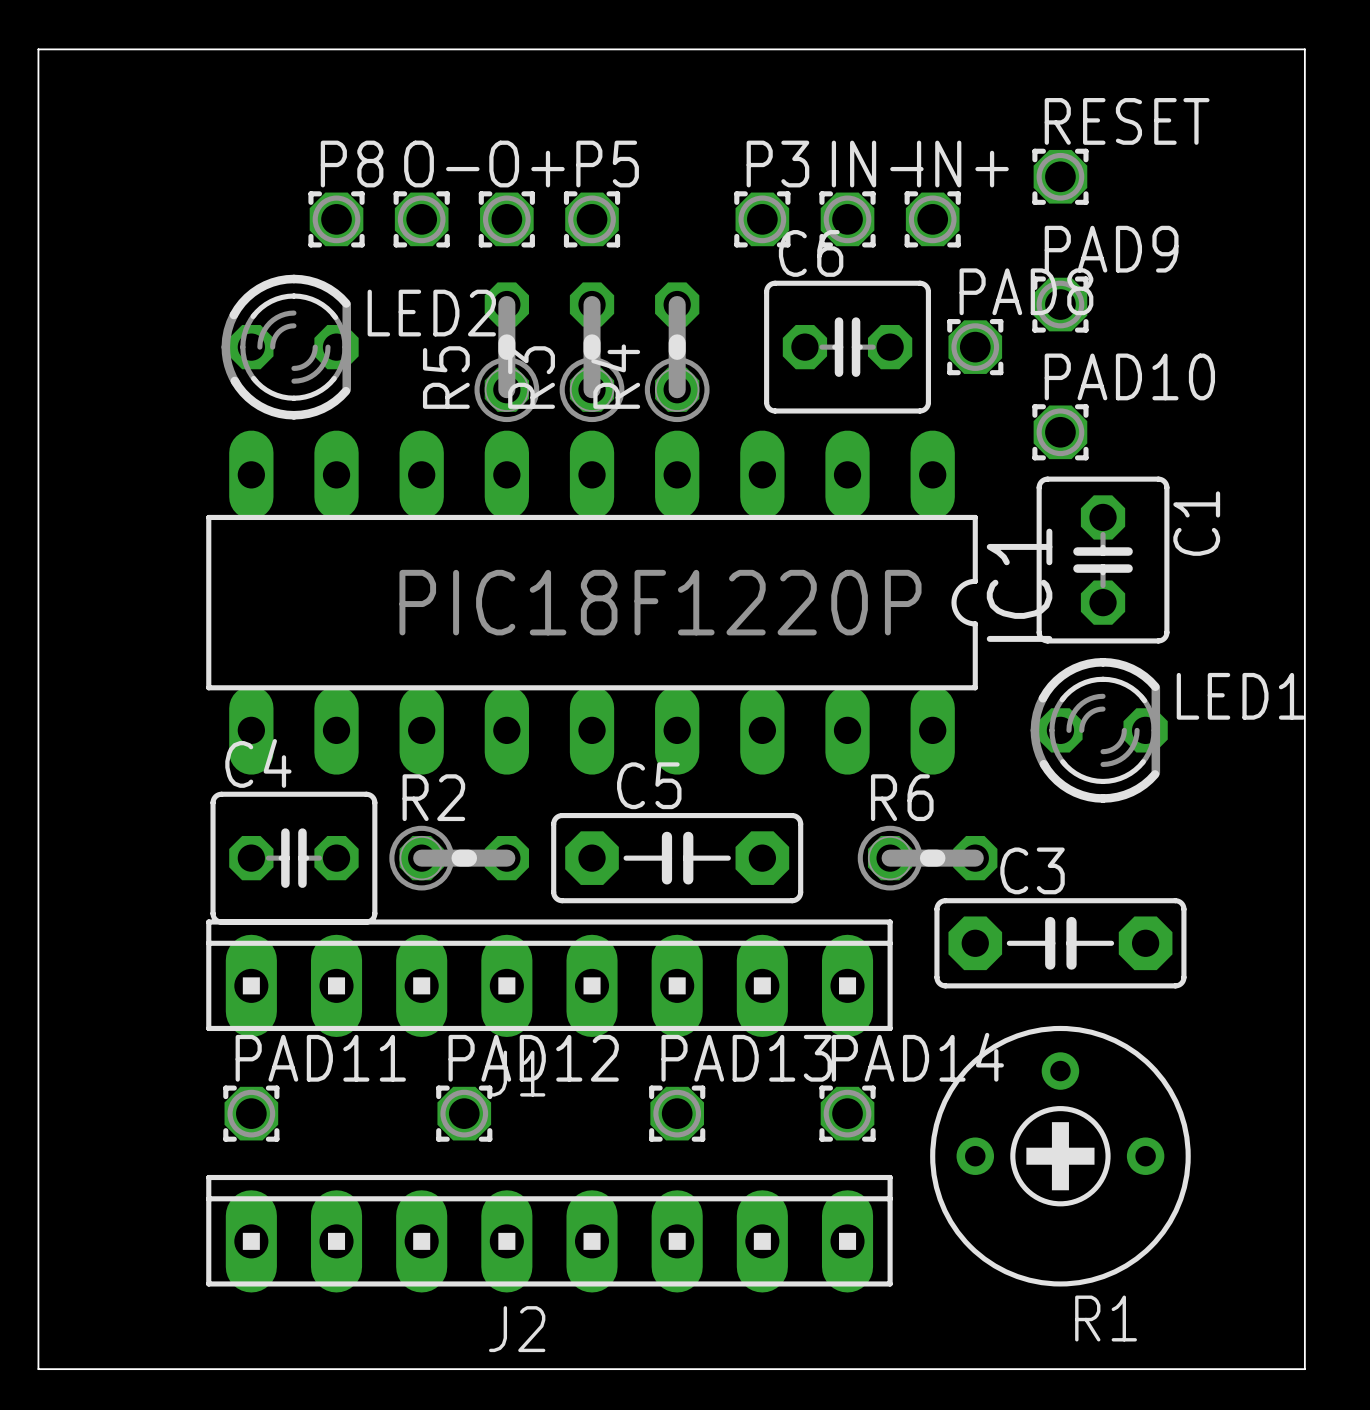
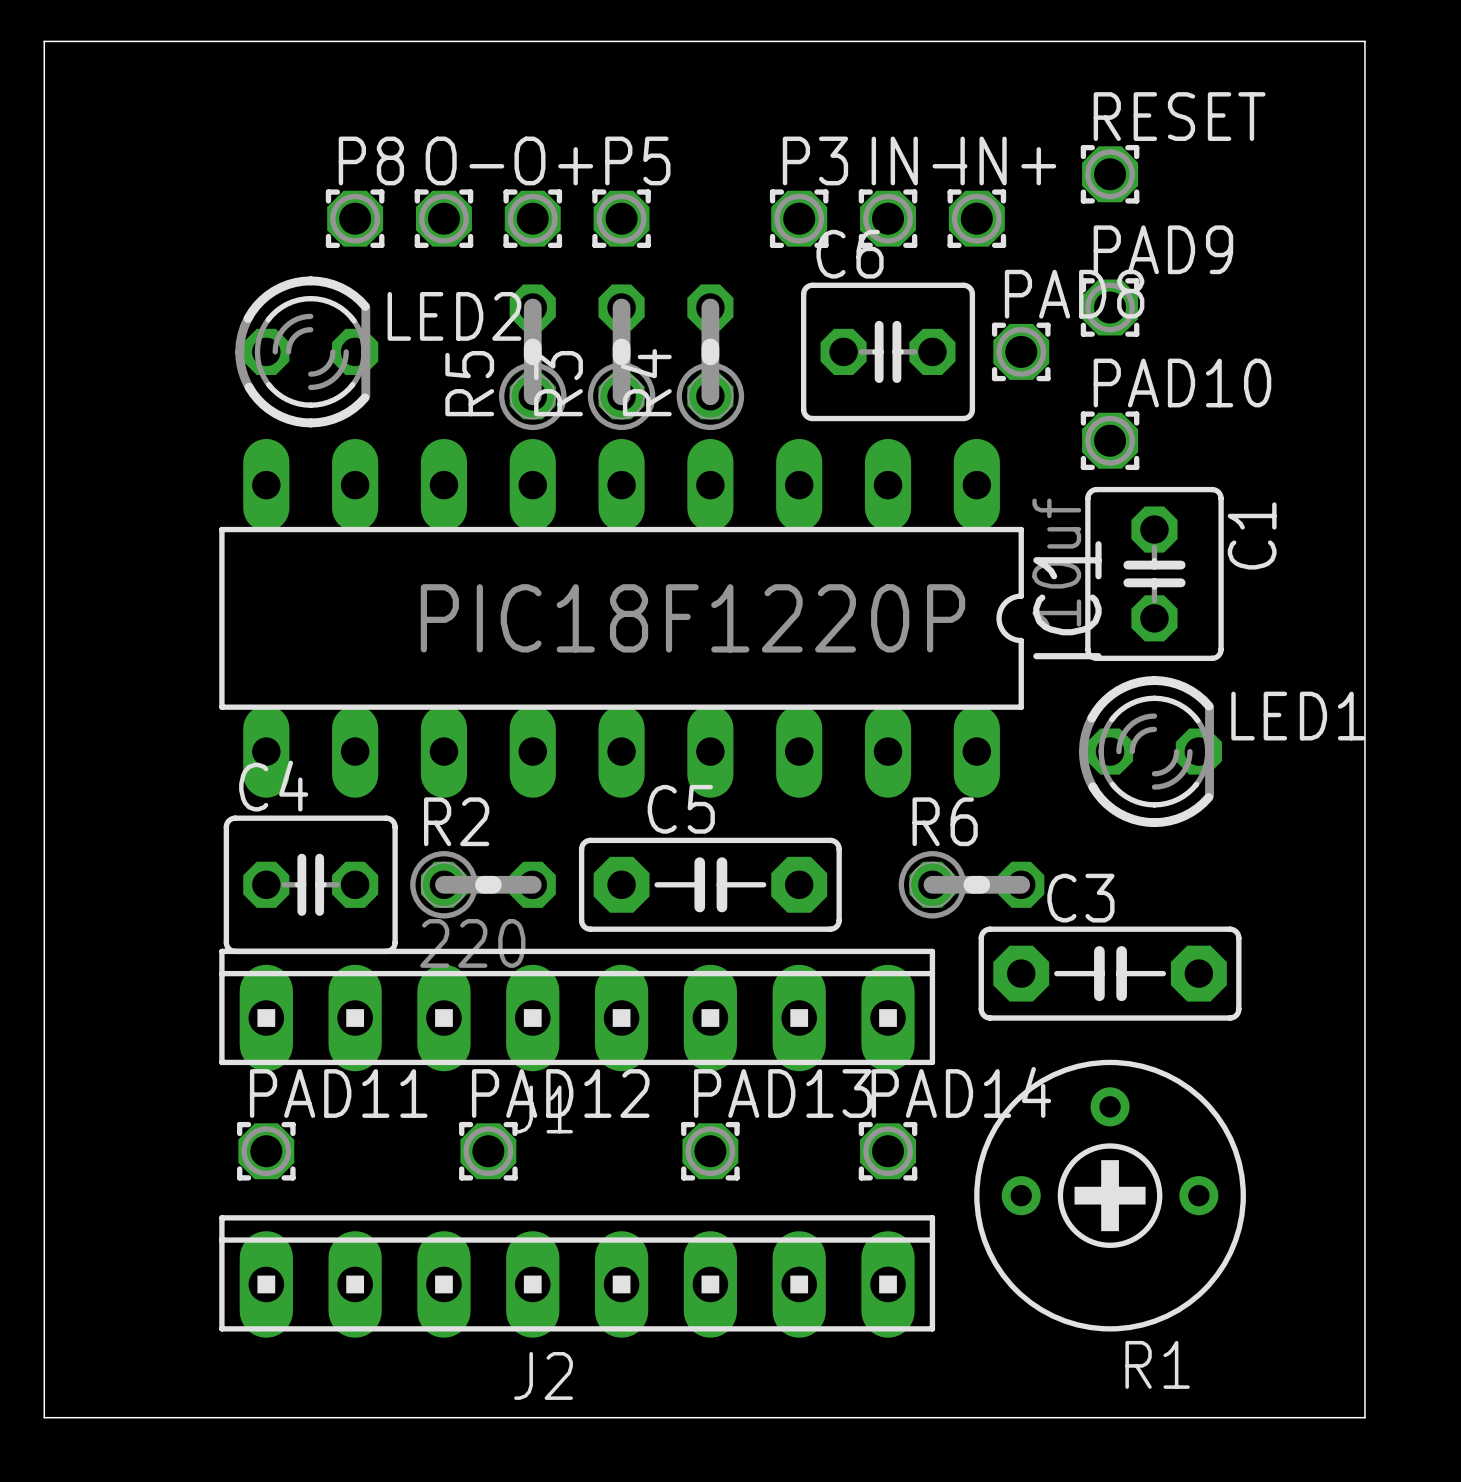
C1 value: none -> 10uf (1056, 562)
R2 value: none -> 220 (472, 943)

